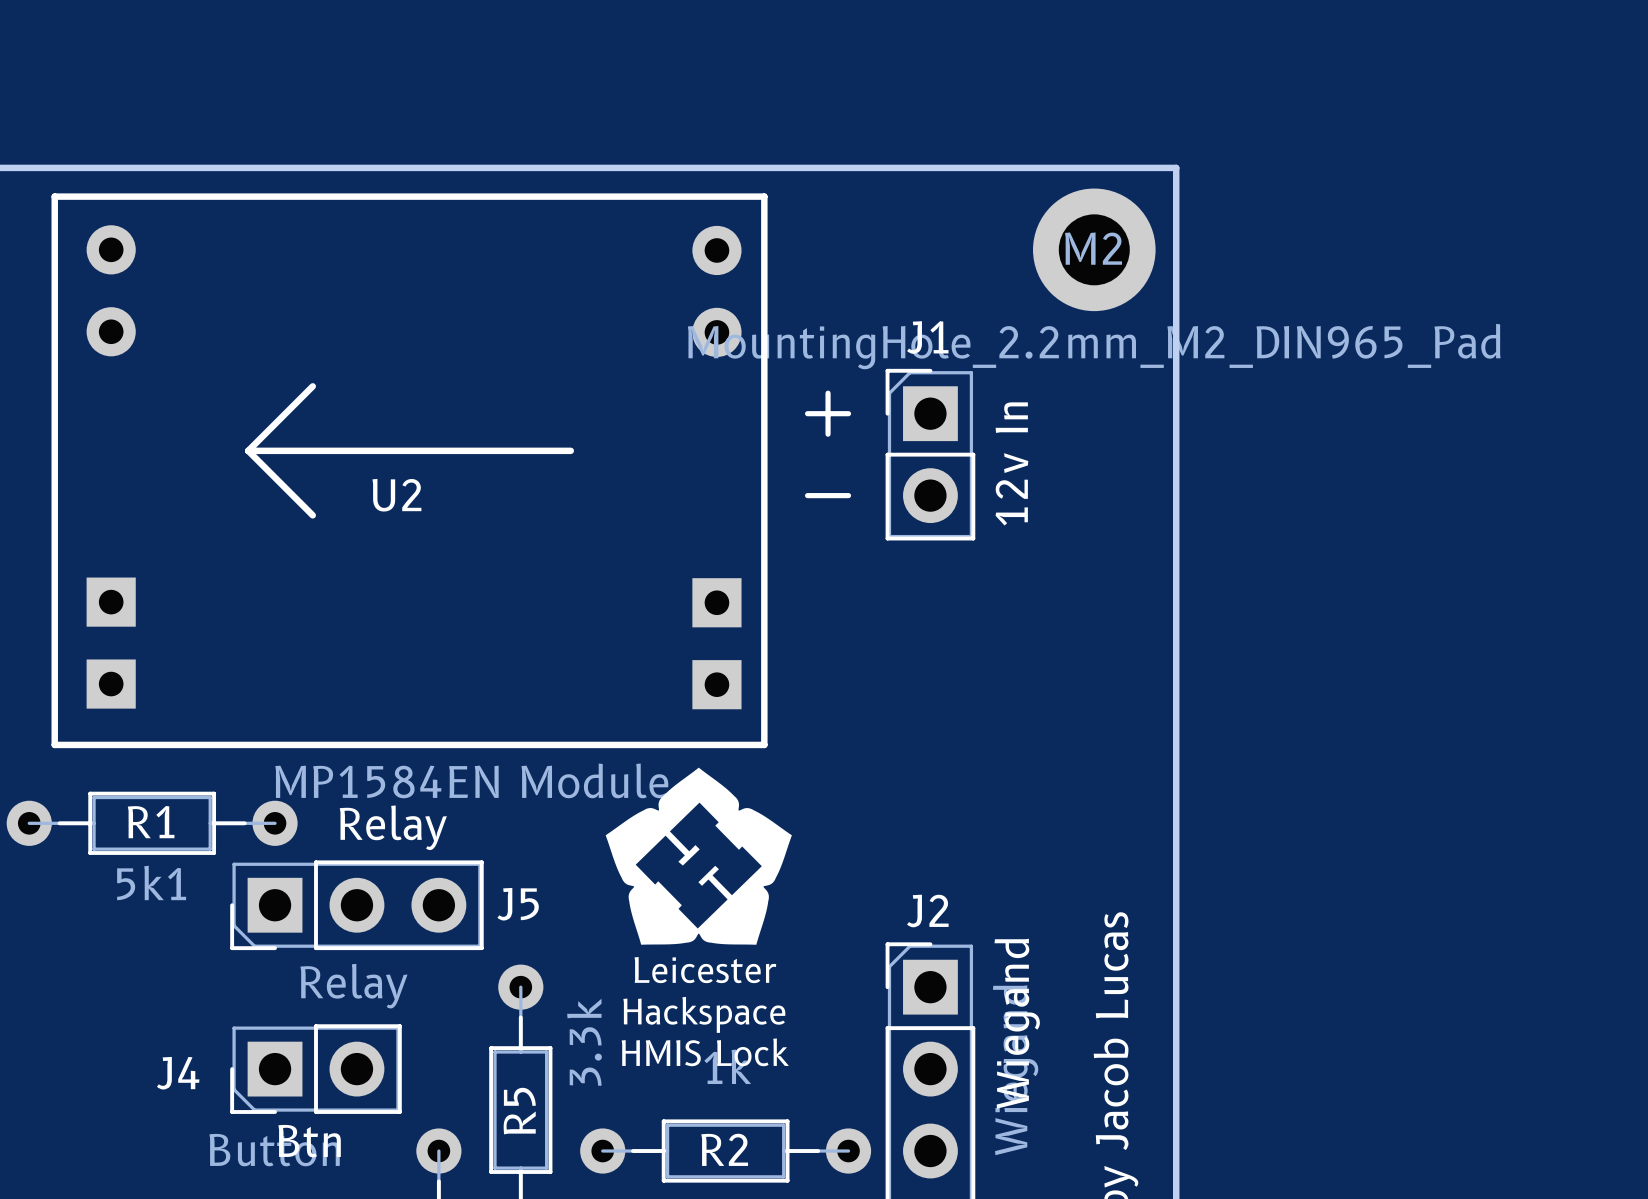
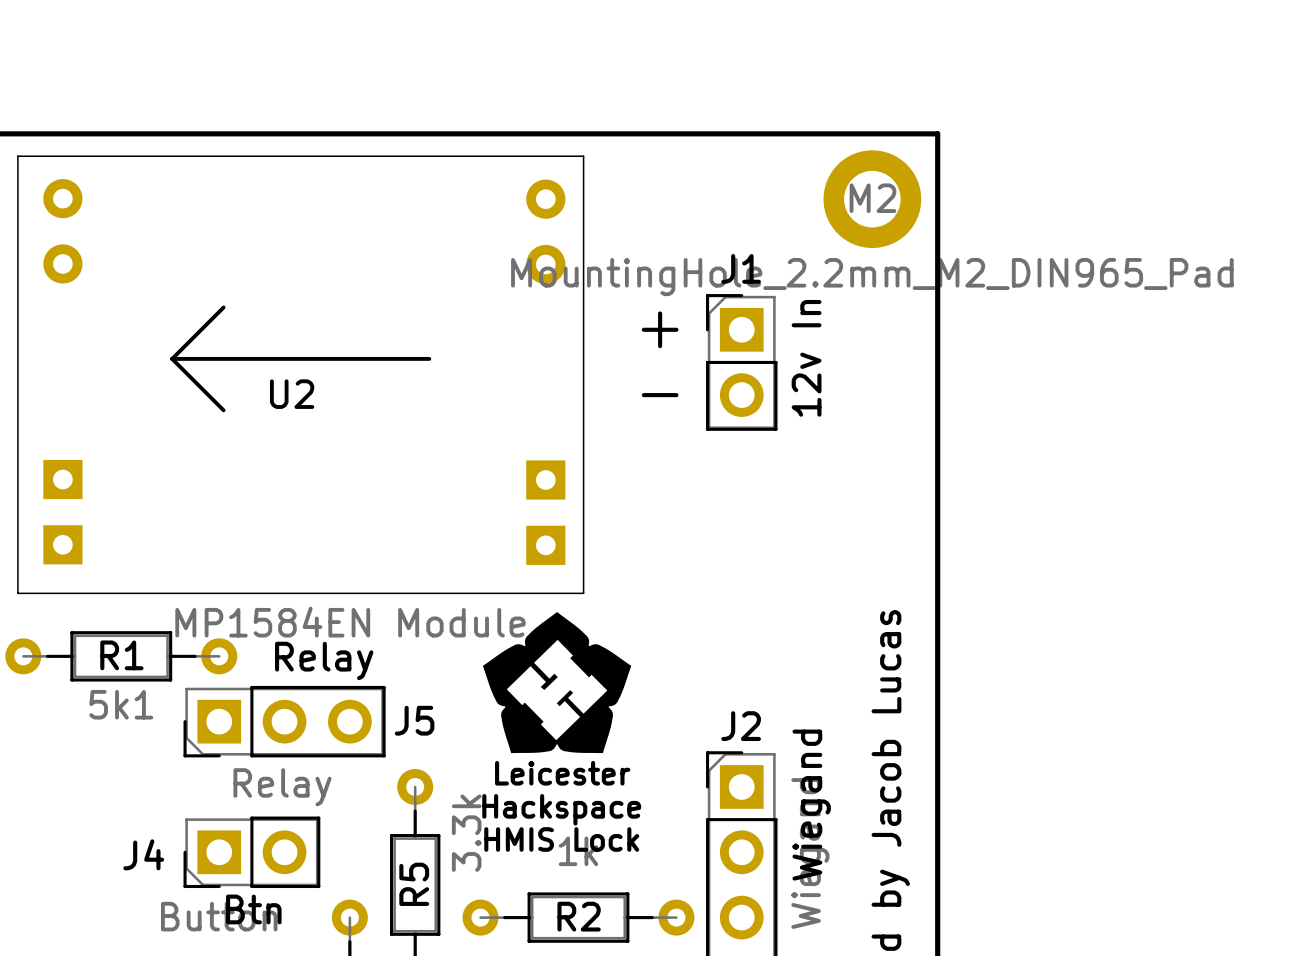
U2 footprint: [51, 193, 768, 749] -> [17, 155, 585, 594]

